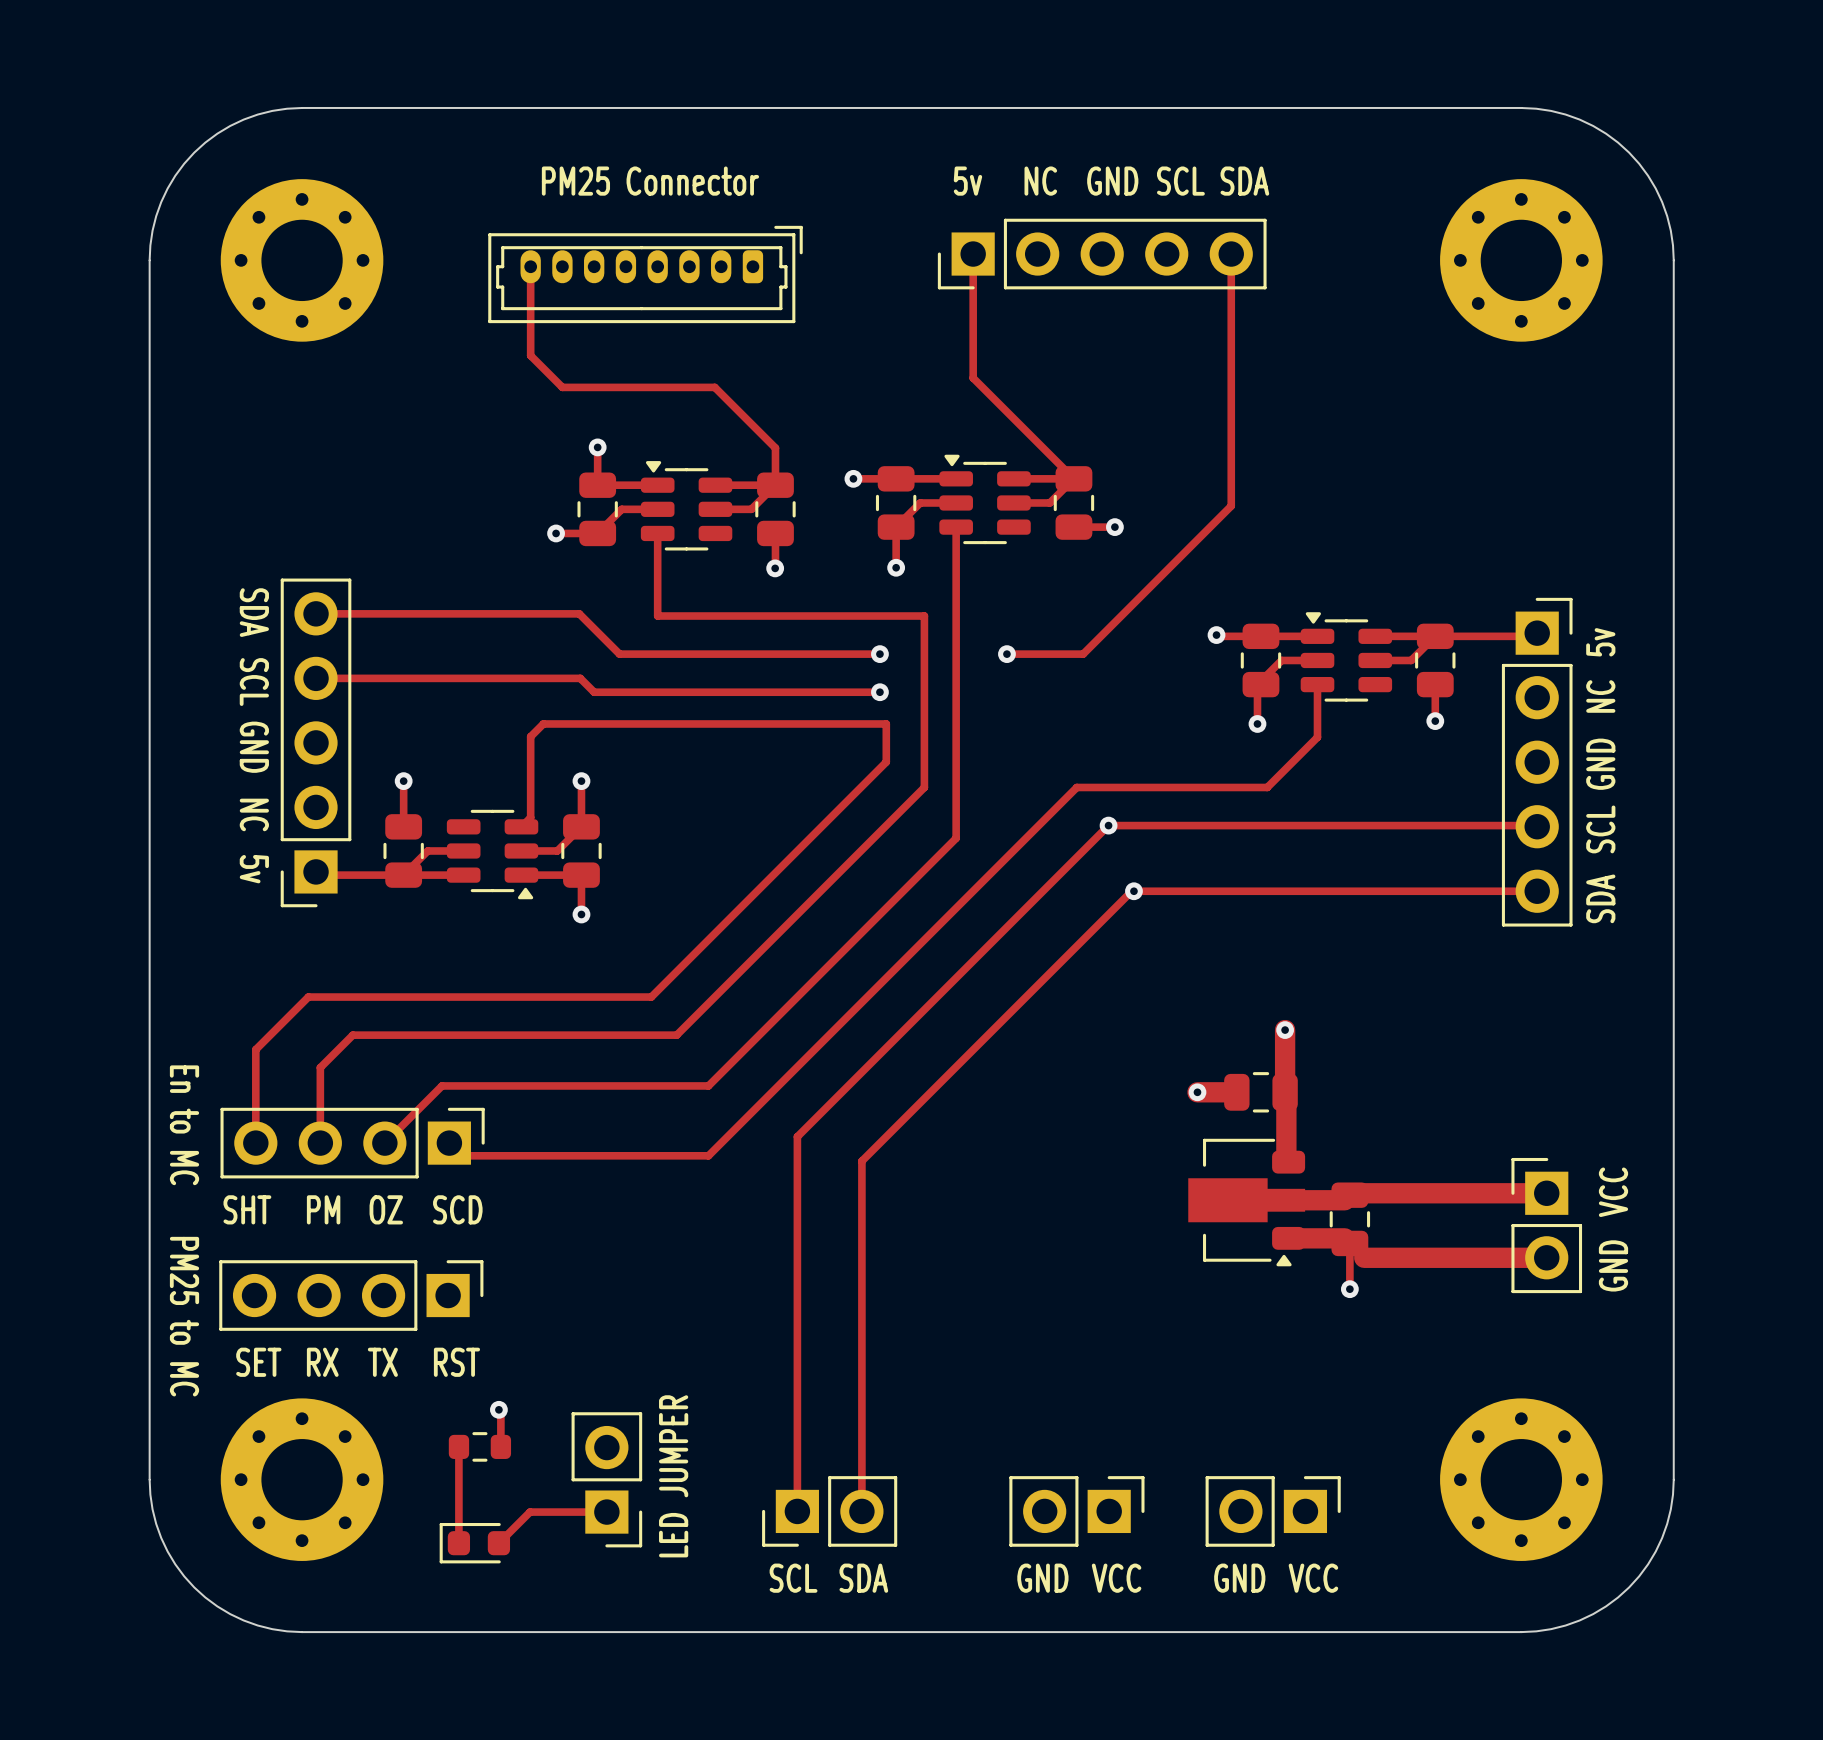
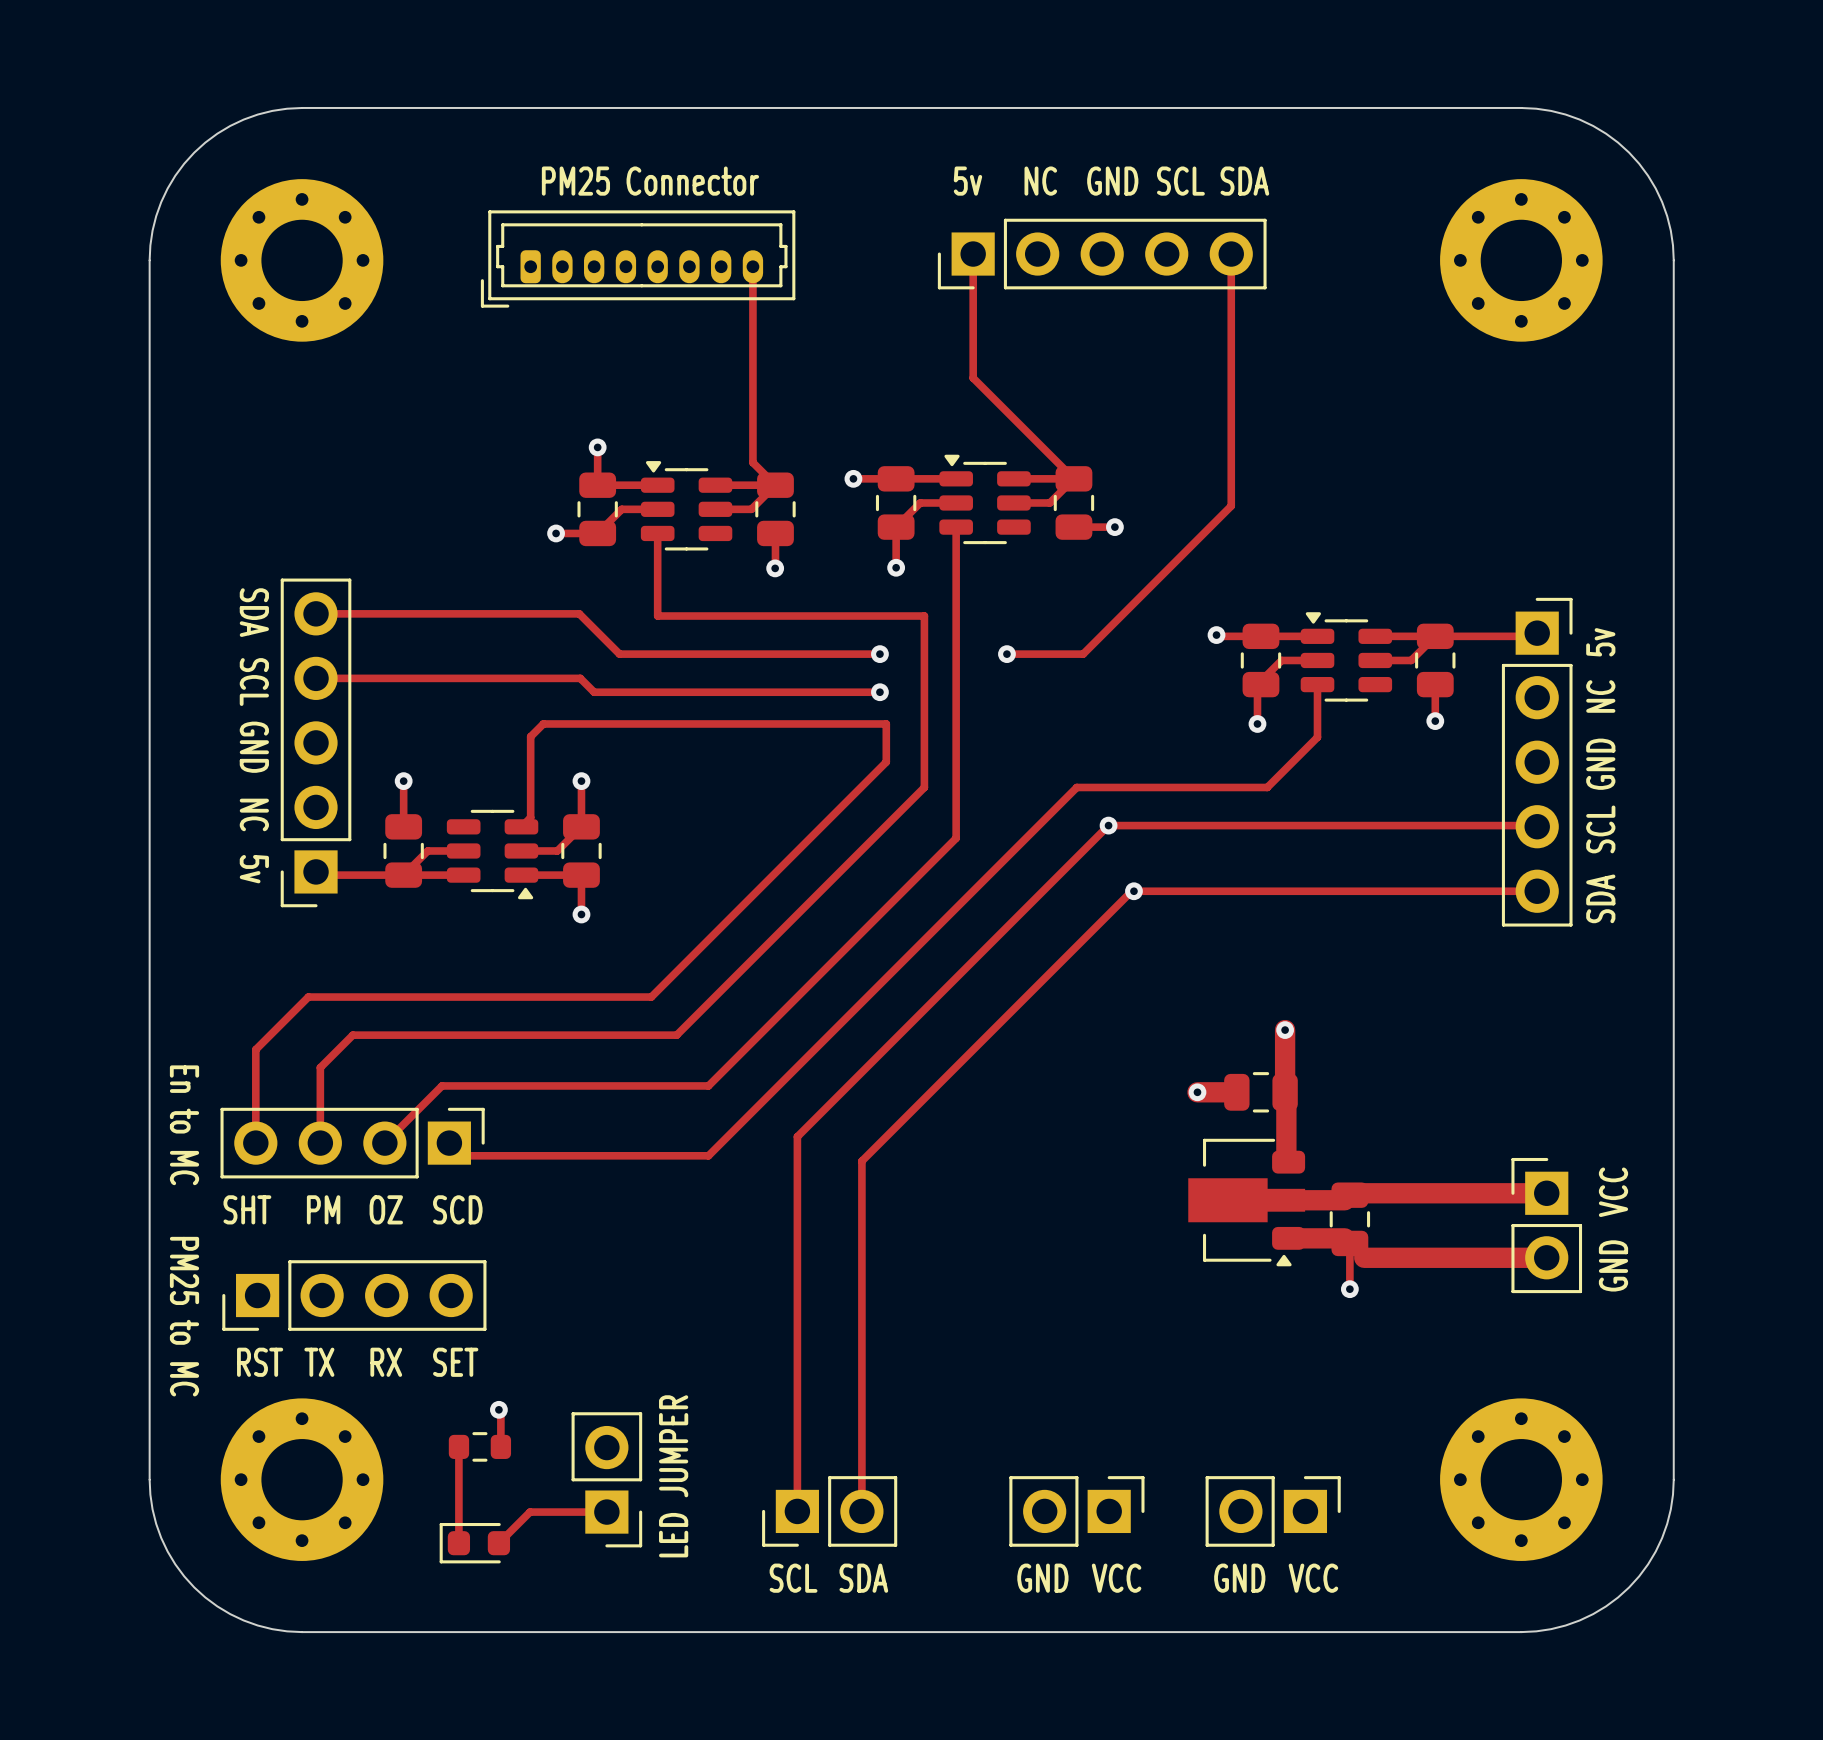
track: (530, 266) (530, 355) (562, 387) (714, 387) (775, 448) (775, 485) -> (752, 266) (752, 462) (775, 485)
part rotation: 0° (645, 274) -> 180° (638, 258)
part rotation: 0° (351, 1295) -> 180° (354, 1295)
text: SET (258, 1362) -> RST (260, 1362)
text: RX (322, 1362) -> TX (319, 1362)
text: TX (382, 1362) -> RX (386, 1362)
text: RST (456, 1362) -> SET (455, 1362)

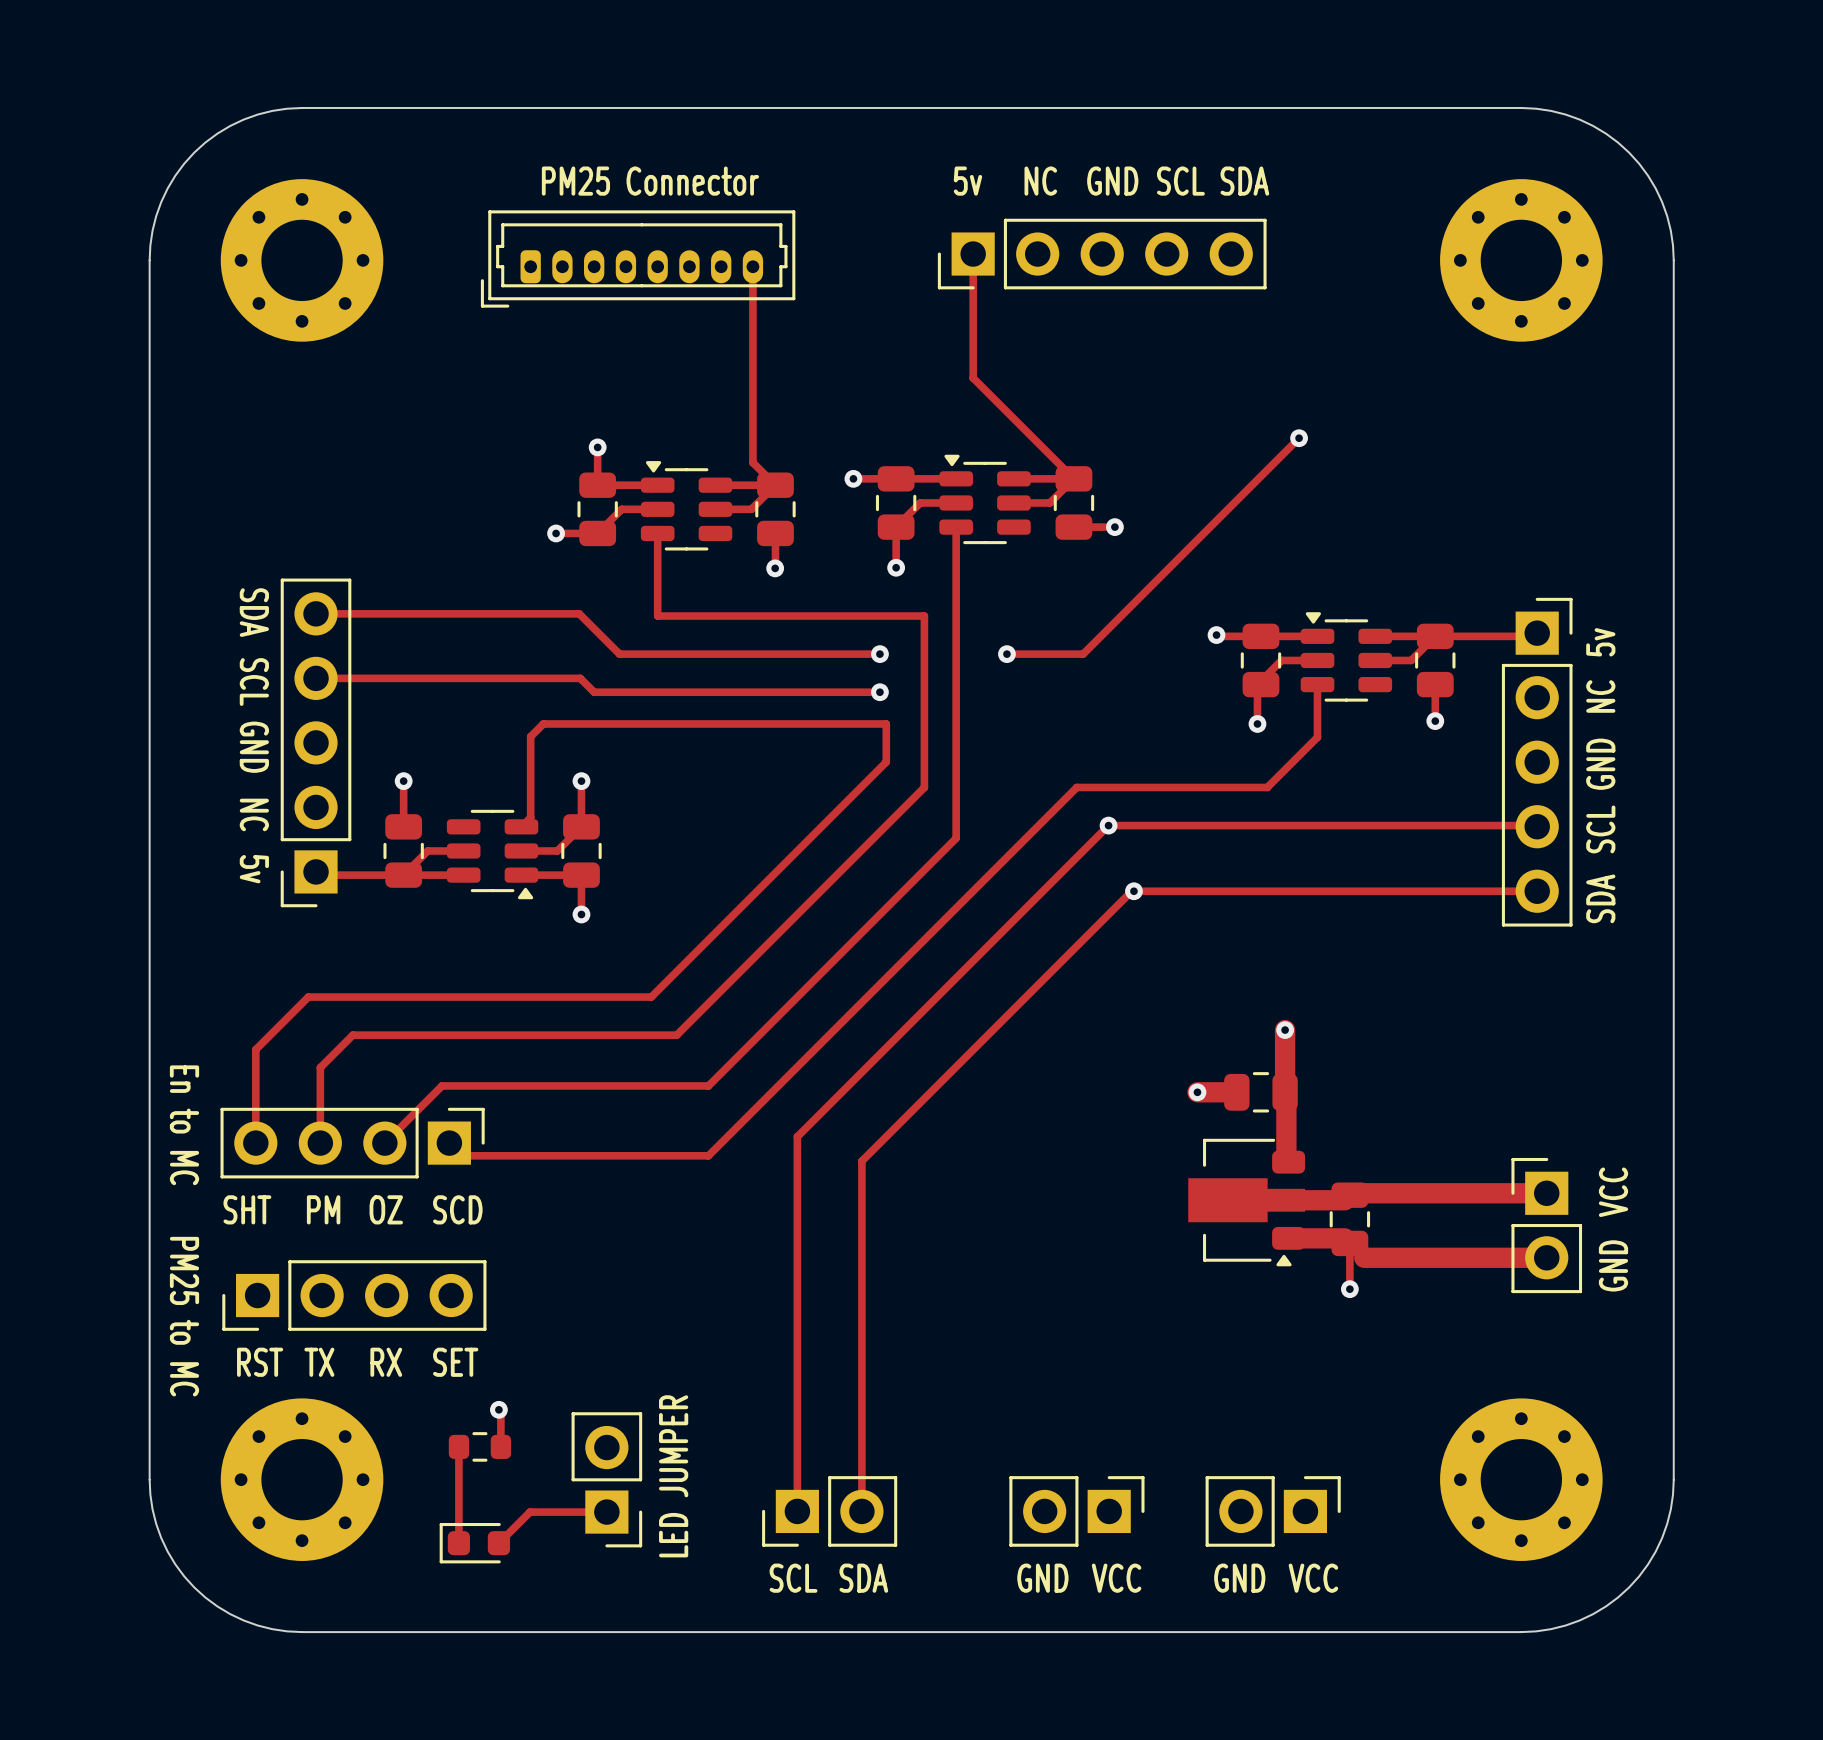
track: (1231, 254) (1231, 506) -> (1299, 438) (1231, 506)
via: none -> (1299, 438)

